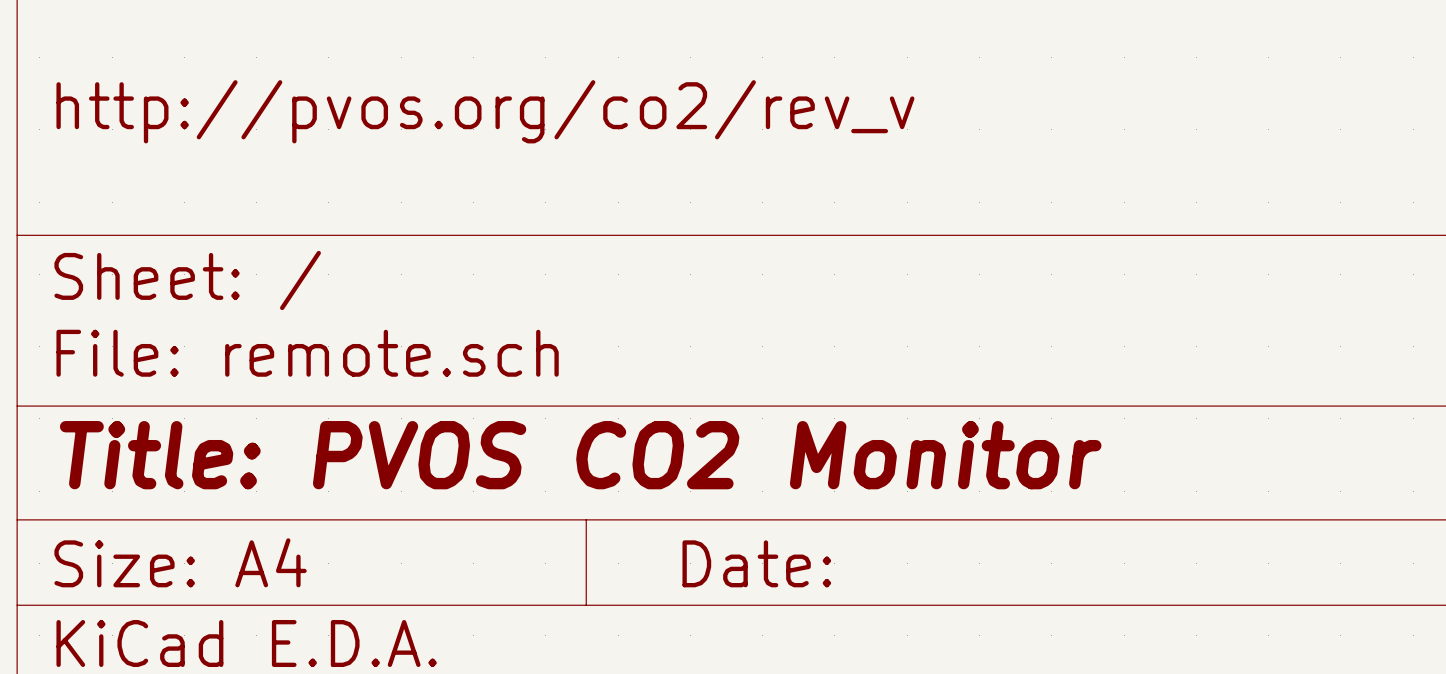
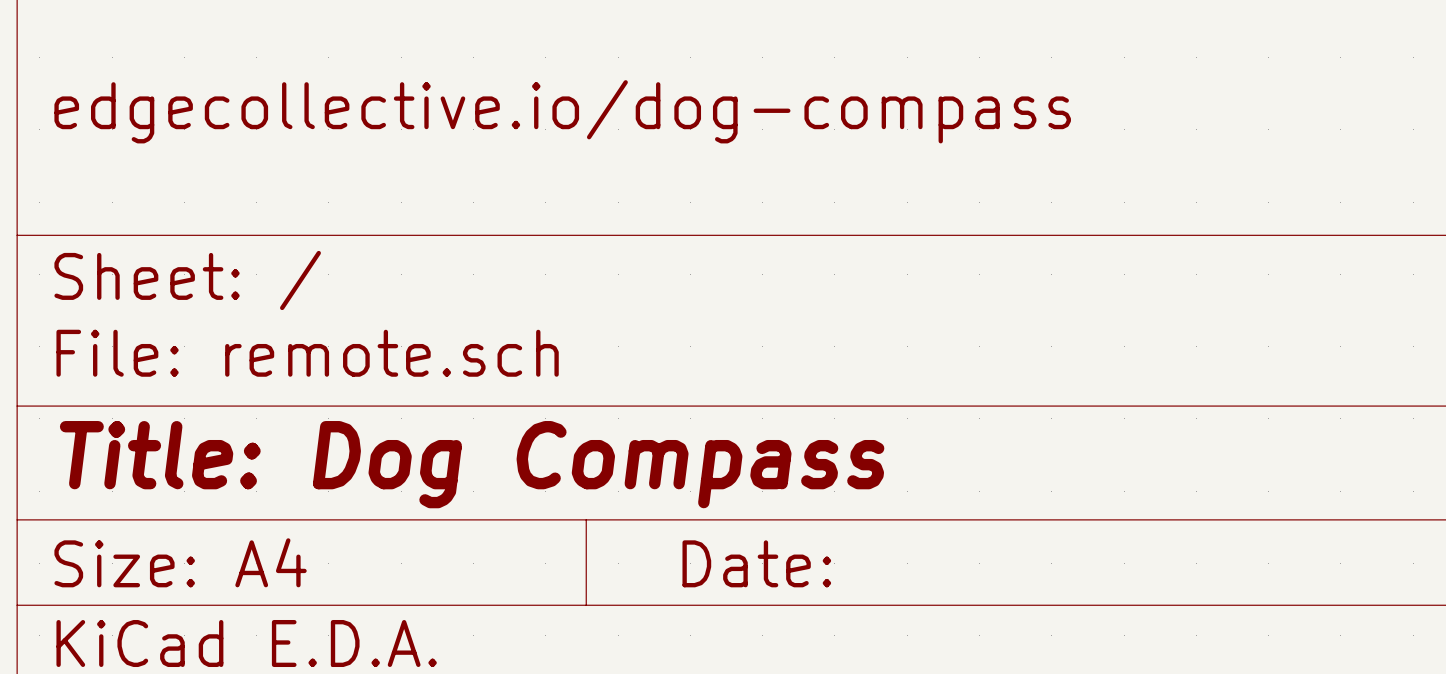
title block: http://pvos.org/co2/rev_v (485, 111) -> edgecollective.io/dog-compass (562, 111)
title block: Title: PVOS CO2 Monitor (580, 455) -> Title: Dog Compass (472, 464)

